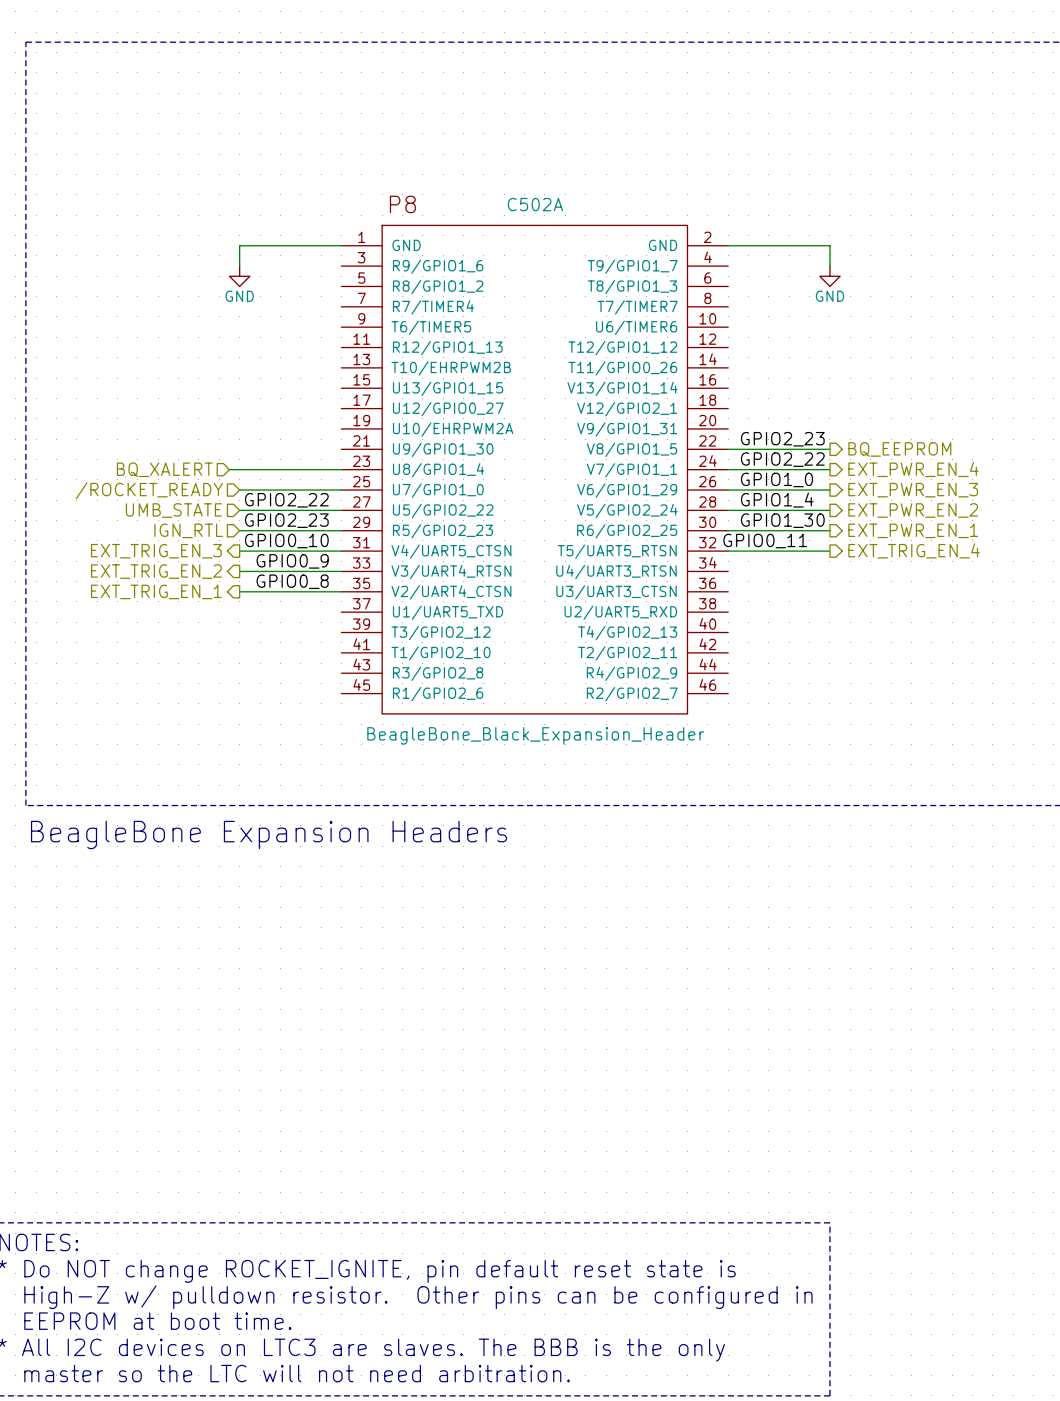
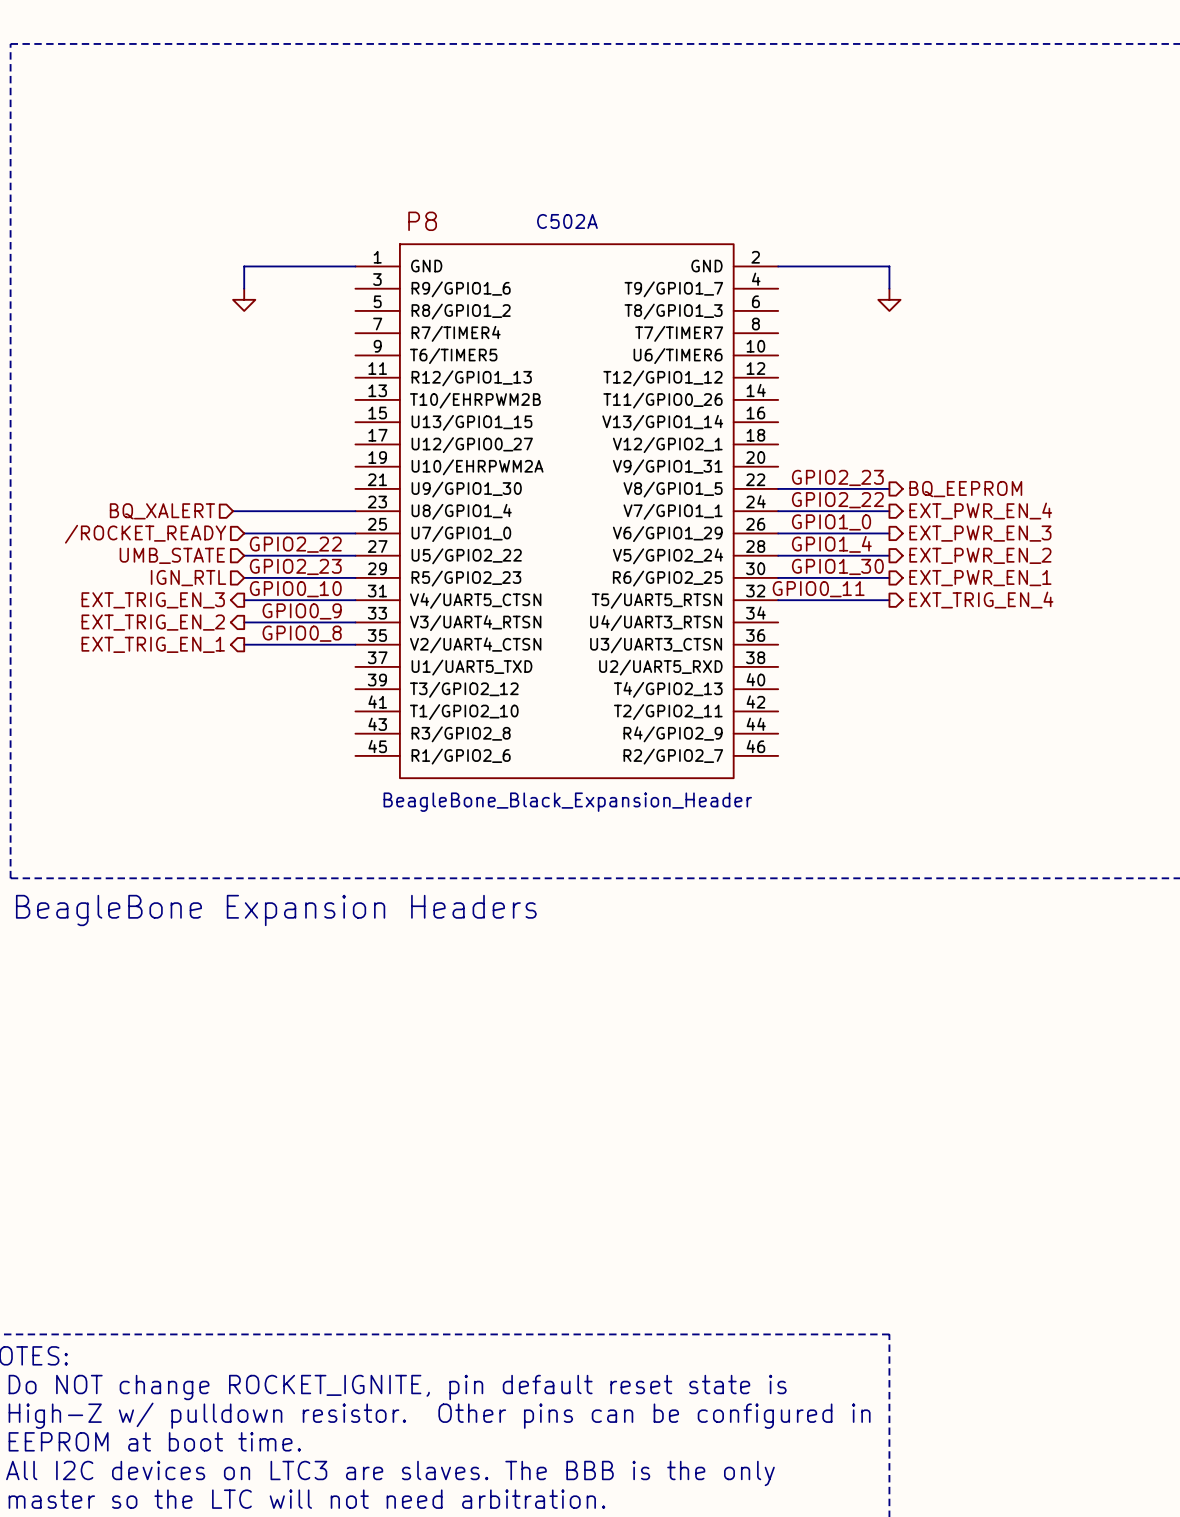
power symbol text: GND (239, 296) -> none
power symbol text: GND (829, 296) -> none

